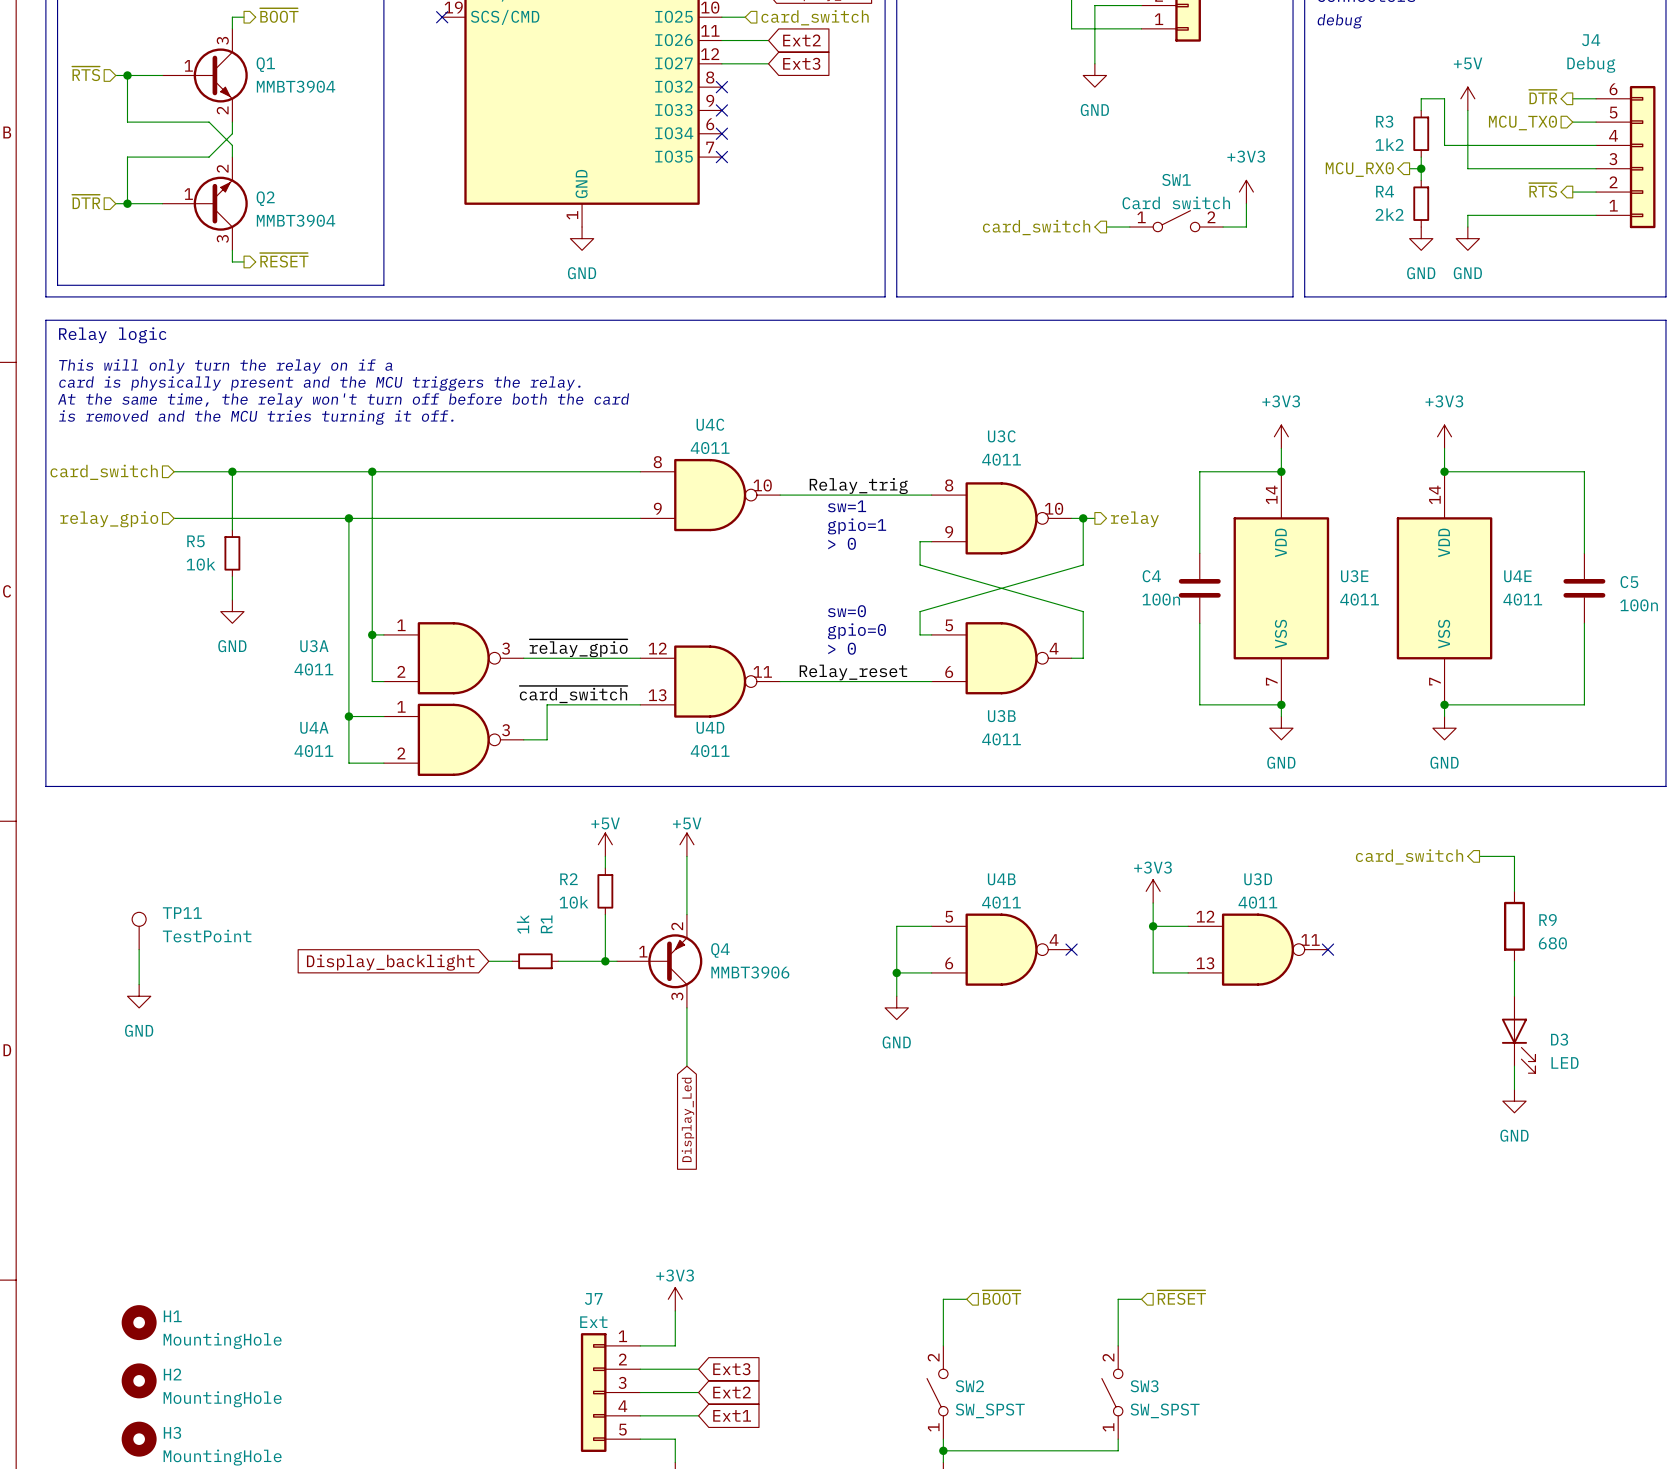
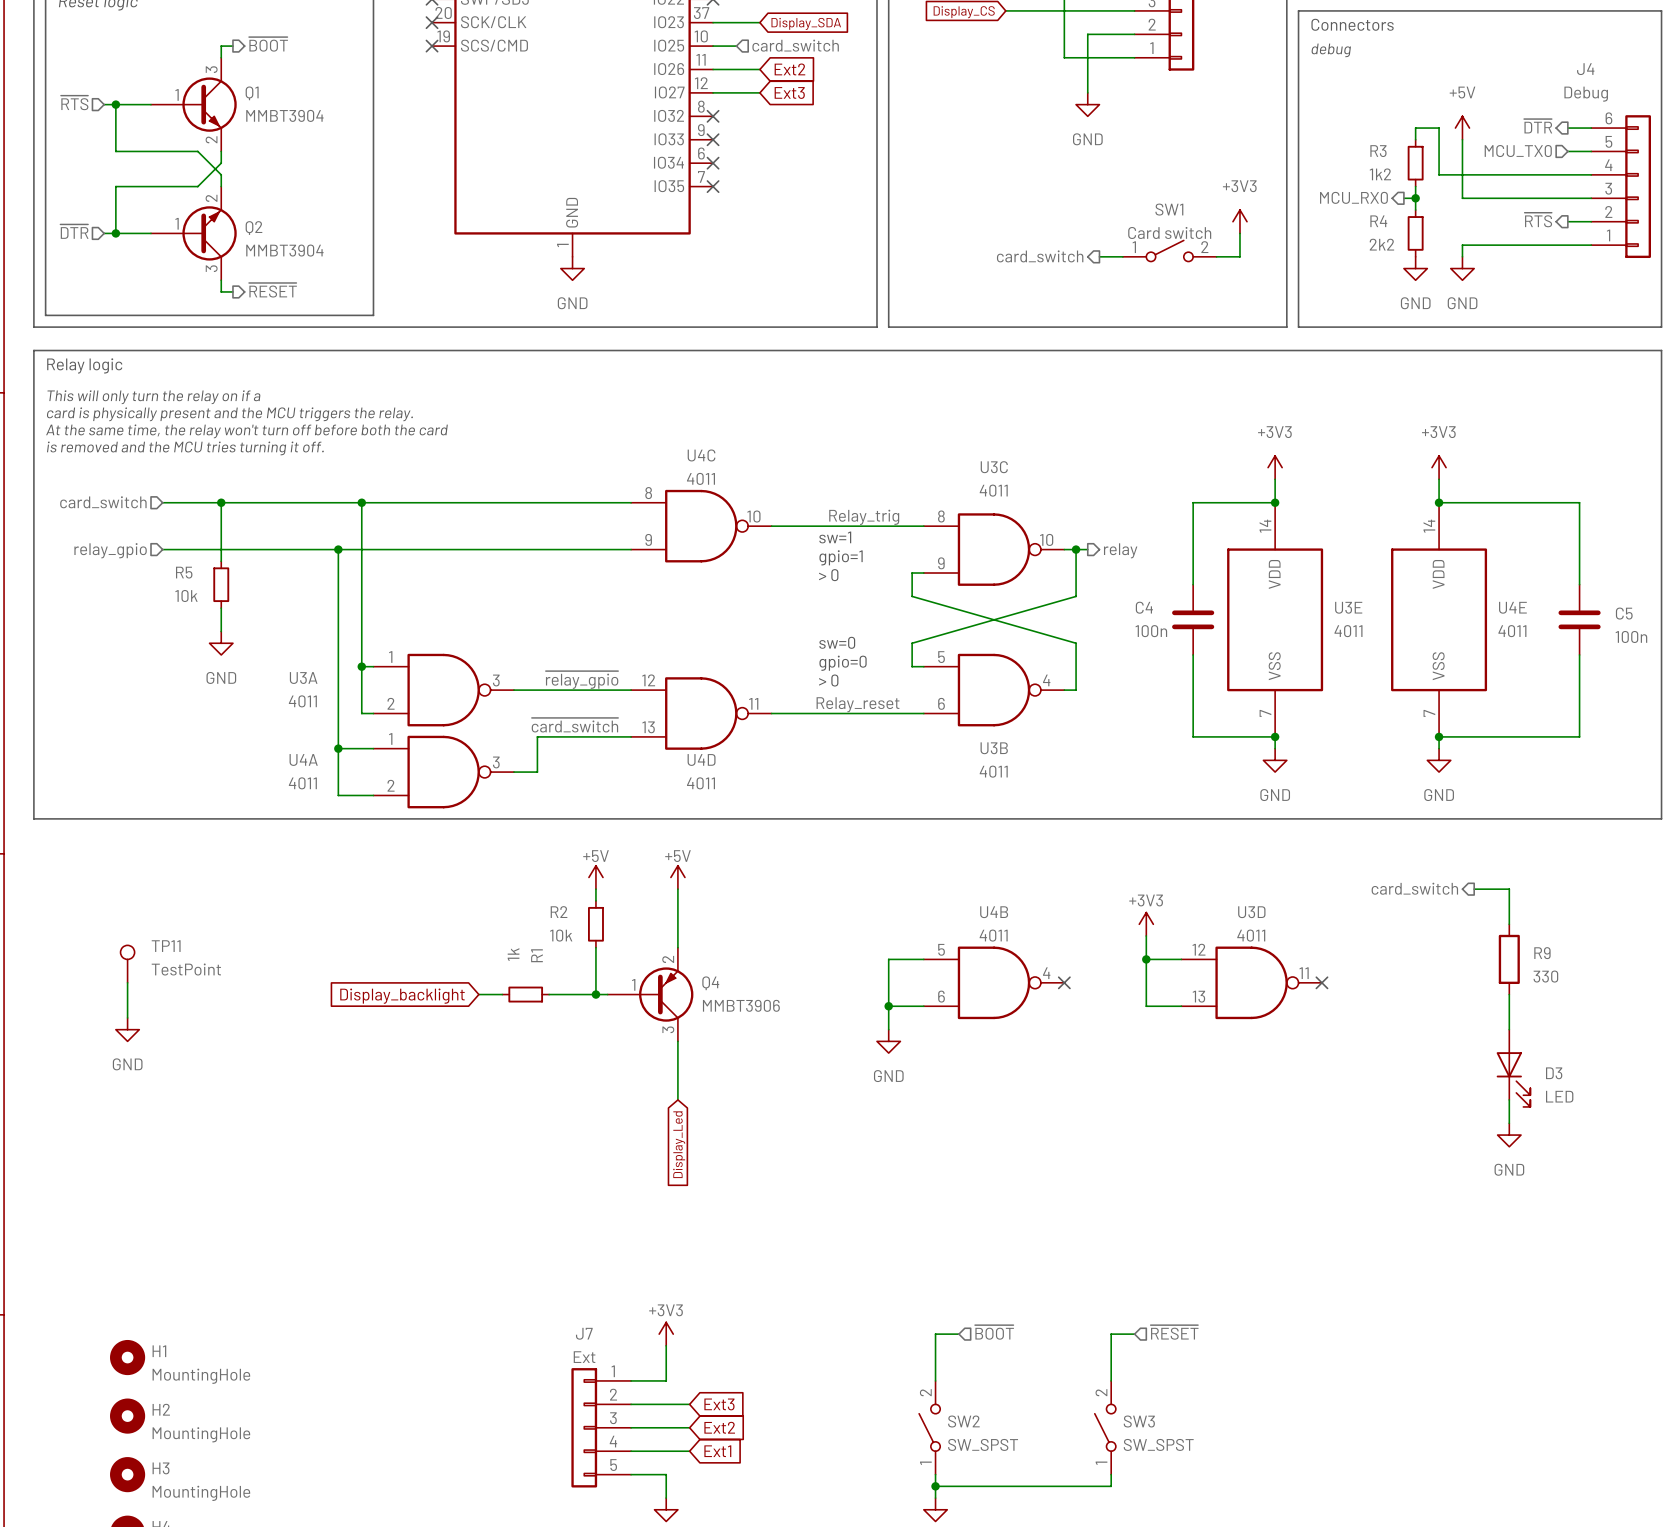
R9 value: 680 (1552, 943) -> 330 (1545, 976)

